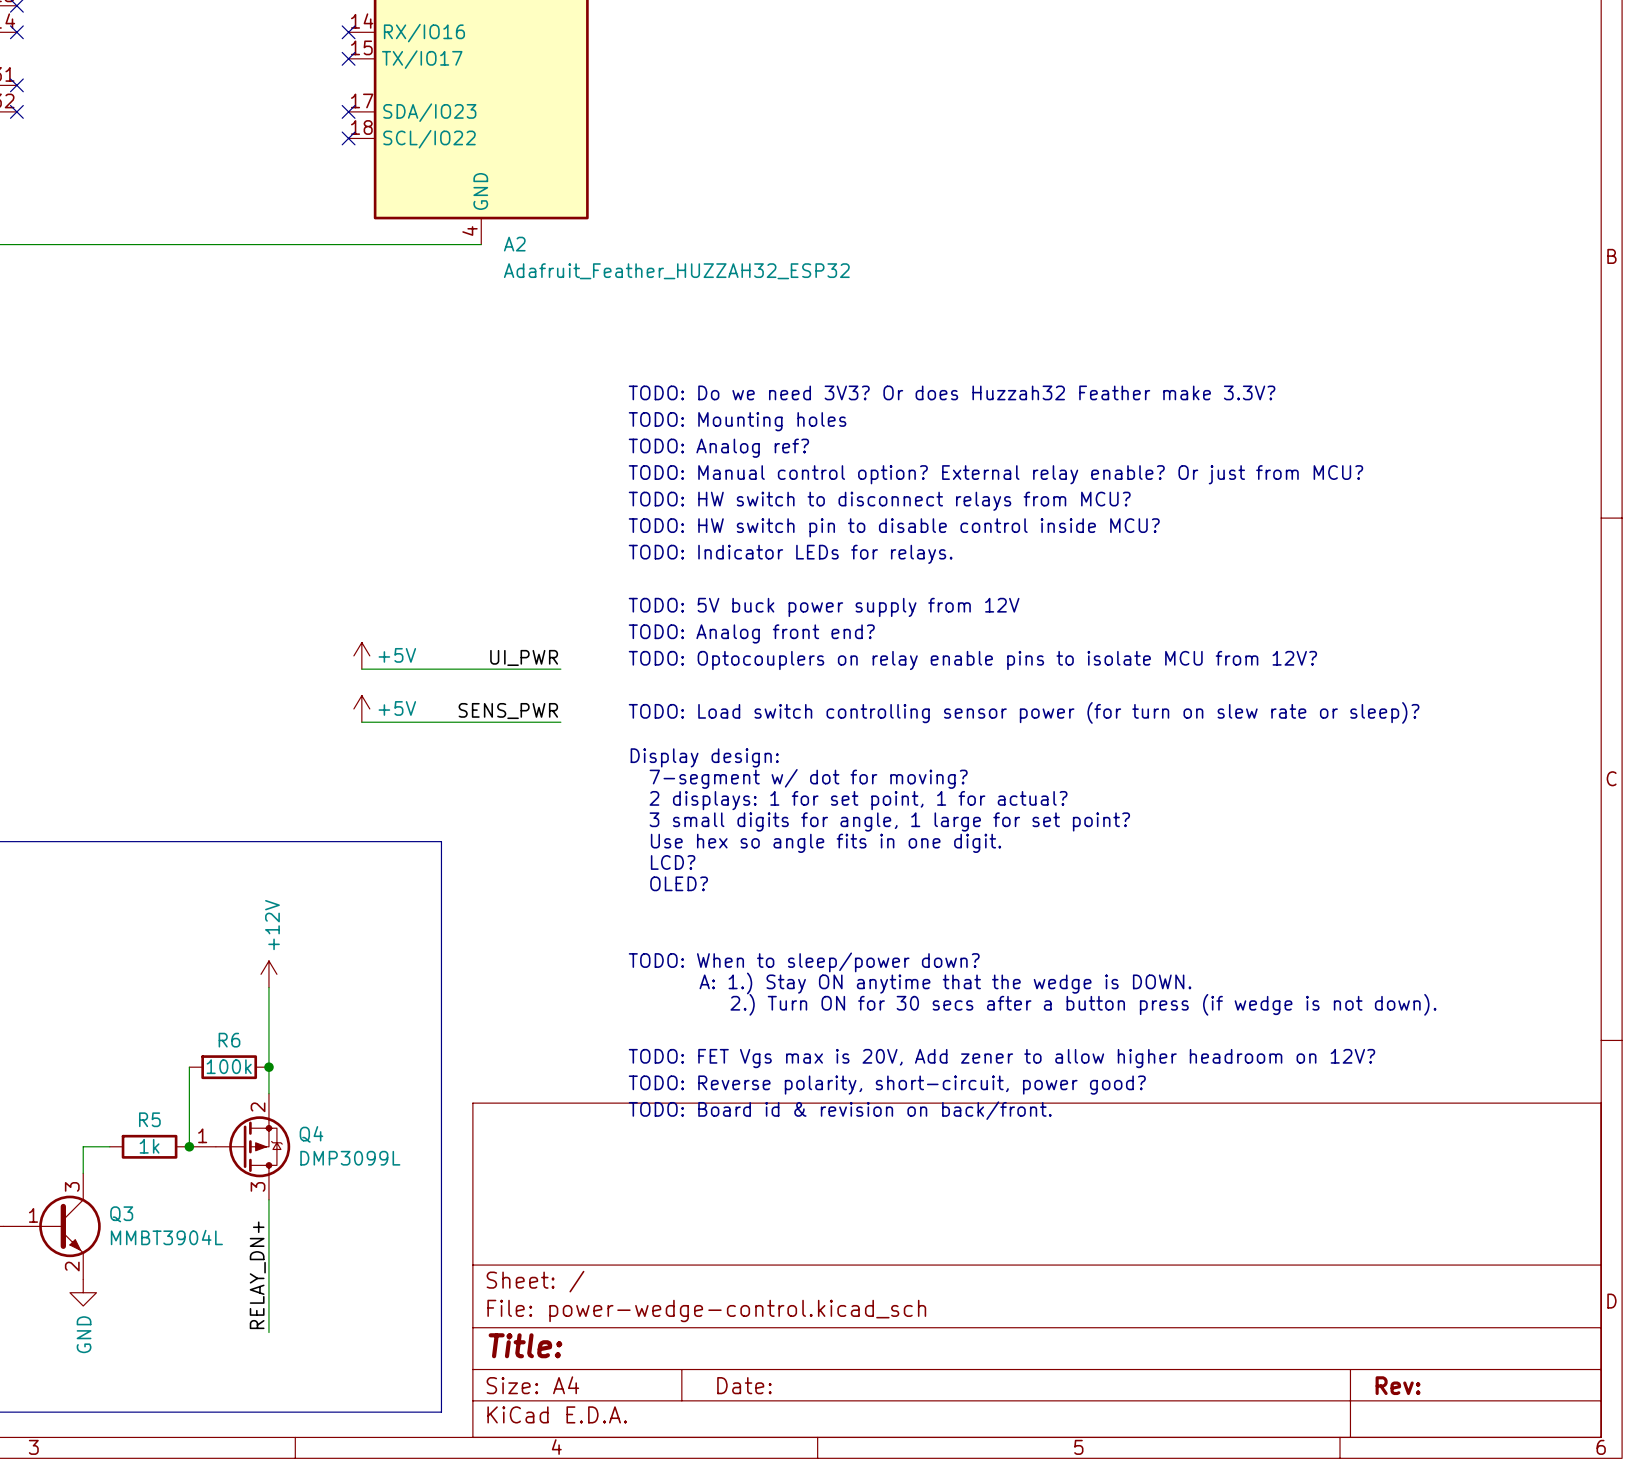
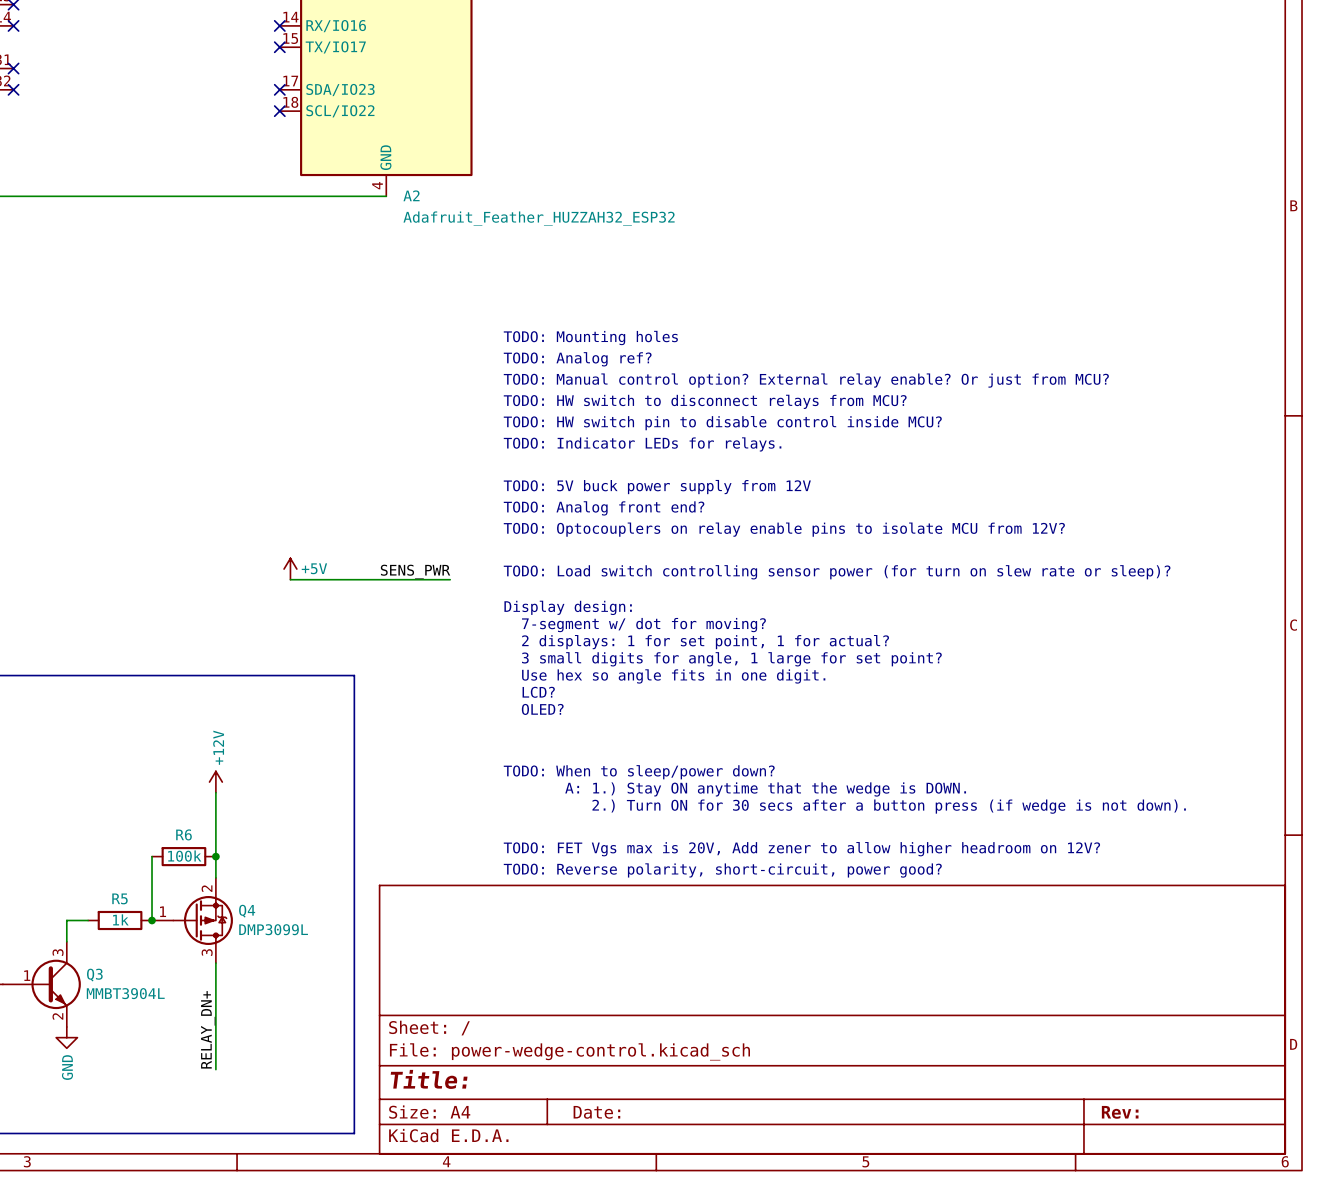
text: TODO: Do we need 3V3? Or does Huzzah32 Feather make 3.3V? (952, 392) -> none
power symbol: +5V (361, 655) -> none
label: UI_PWR (524, 657) -> none
wire: (361, 669) (560, 669) -> none
text: TODO: Board id & revision on back/front. (840, 1110) -> none

